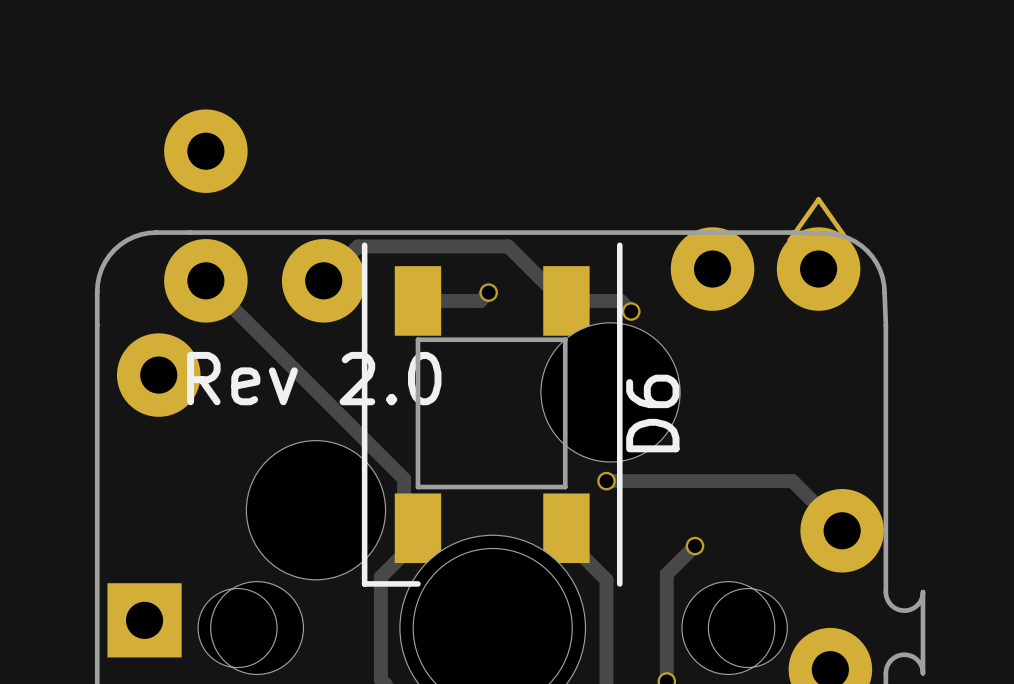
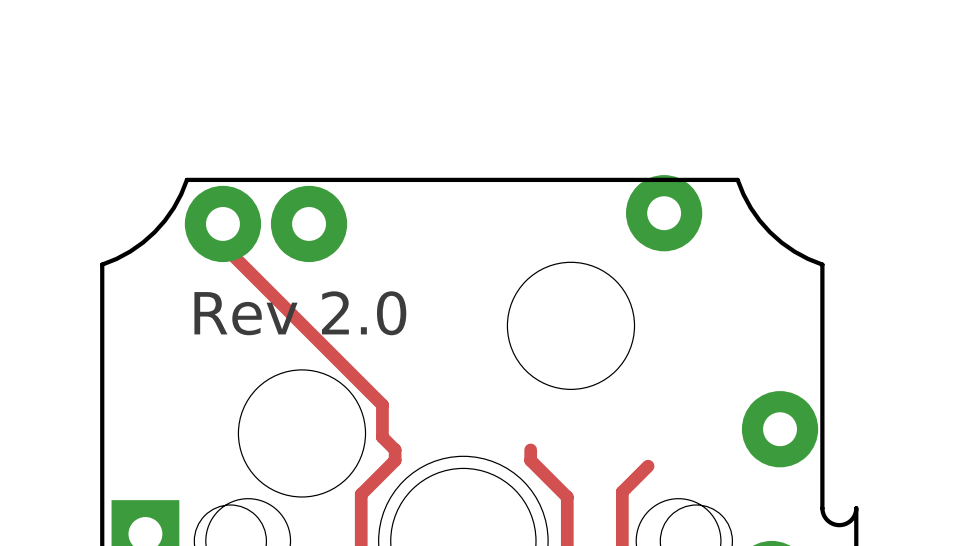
part: (205, 151) -> none
board edge: (190, 232) (148, 233) (126, 240) (114, 249) (105, 262) (99, 276) (97, 291) -> (186, 179) (173, 207) (154, 232) (130, 251) (102, 264)
board edge: (793, 232) (840, 235) (855, 241) (867, 250) (876, 263) (882, 277) (885, 325) -> (737, 179) (750, 207) (770, 232) (794, 251) (822, 264)
part: (818, 253) -> none
part position: (205, 280) -> (222, 223)
track: (323, 280) (358, 246) (508, 246) (562, 300) (620, 300) (631, 311) -> none
board edge: (97, 291) (97, 325) -> none
track: (488, 292) (480, 300) (417, 300) -> none
via: (488, 292) -> none
via: (631, 311) -> none
board edge: (417, 339) (417, 487) (565, 487) (565, 339) (417, 339) -> none
part: (158, 375) -> none
D6: (492, 414) -> none
track: (606, 481) (792, 481) (842, 530) -> none
via: (606, 481) -> none
part position: (842, 530) -> (780, 429)
via: (695, 546) -> none

